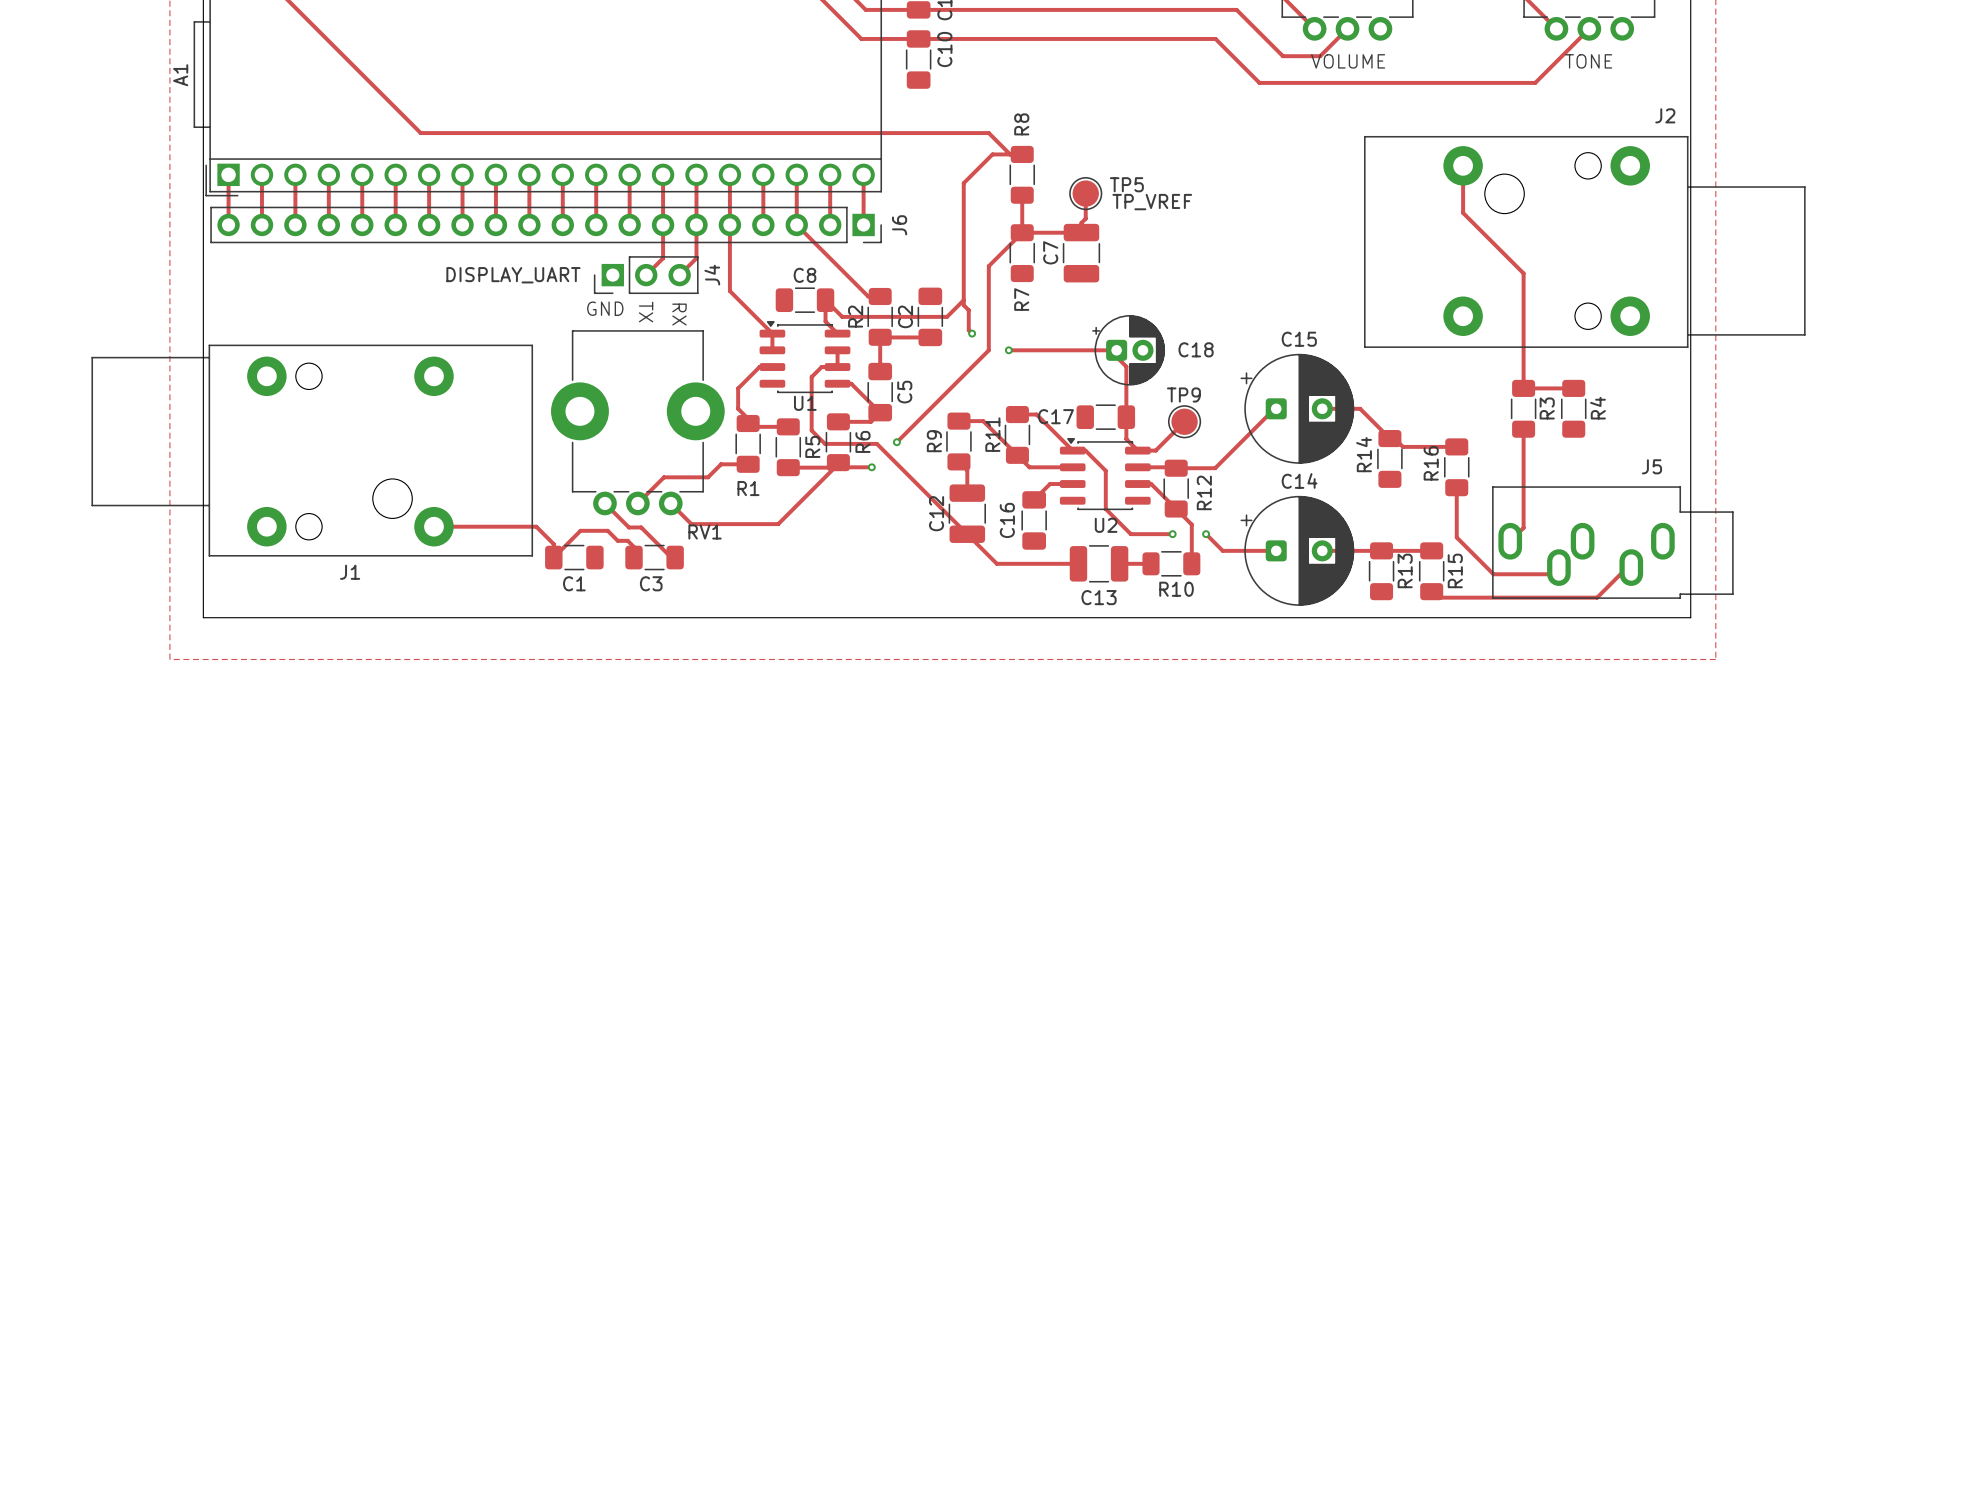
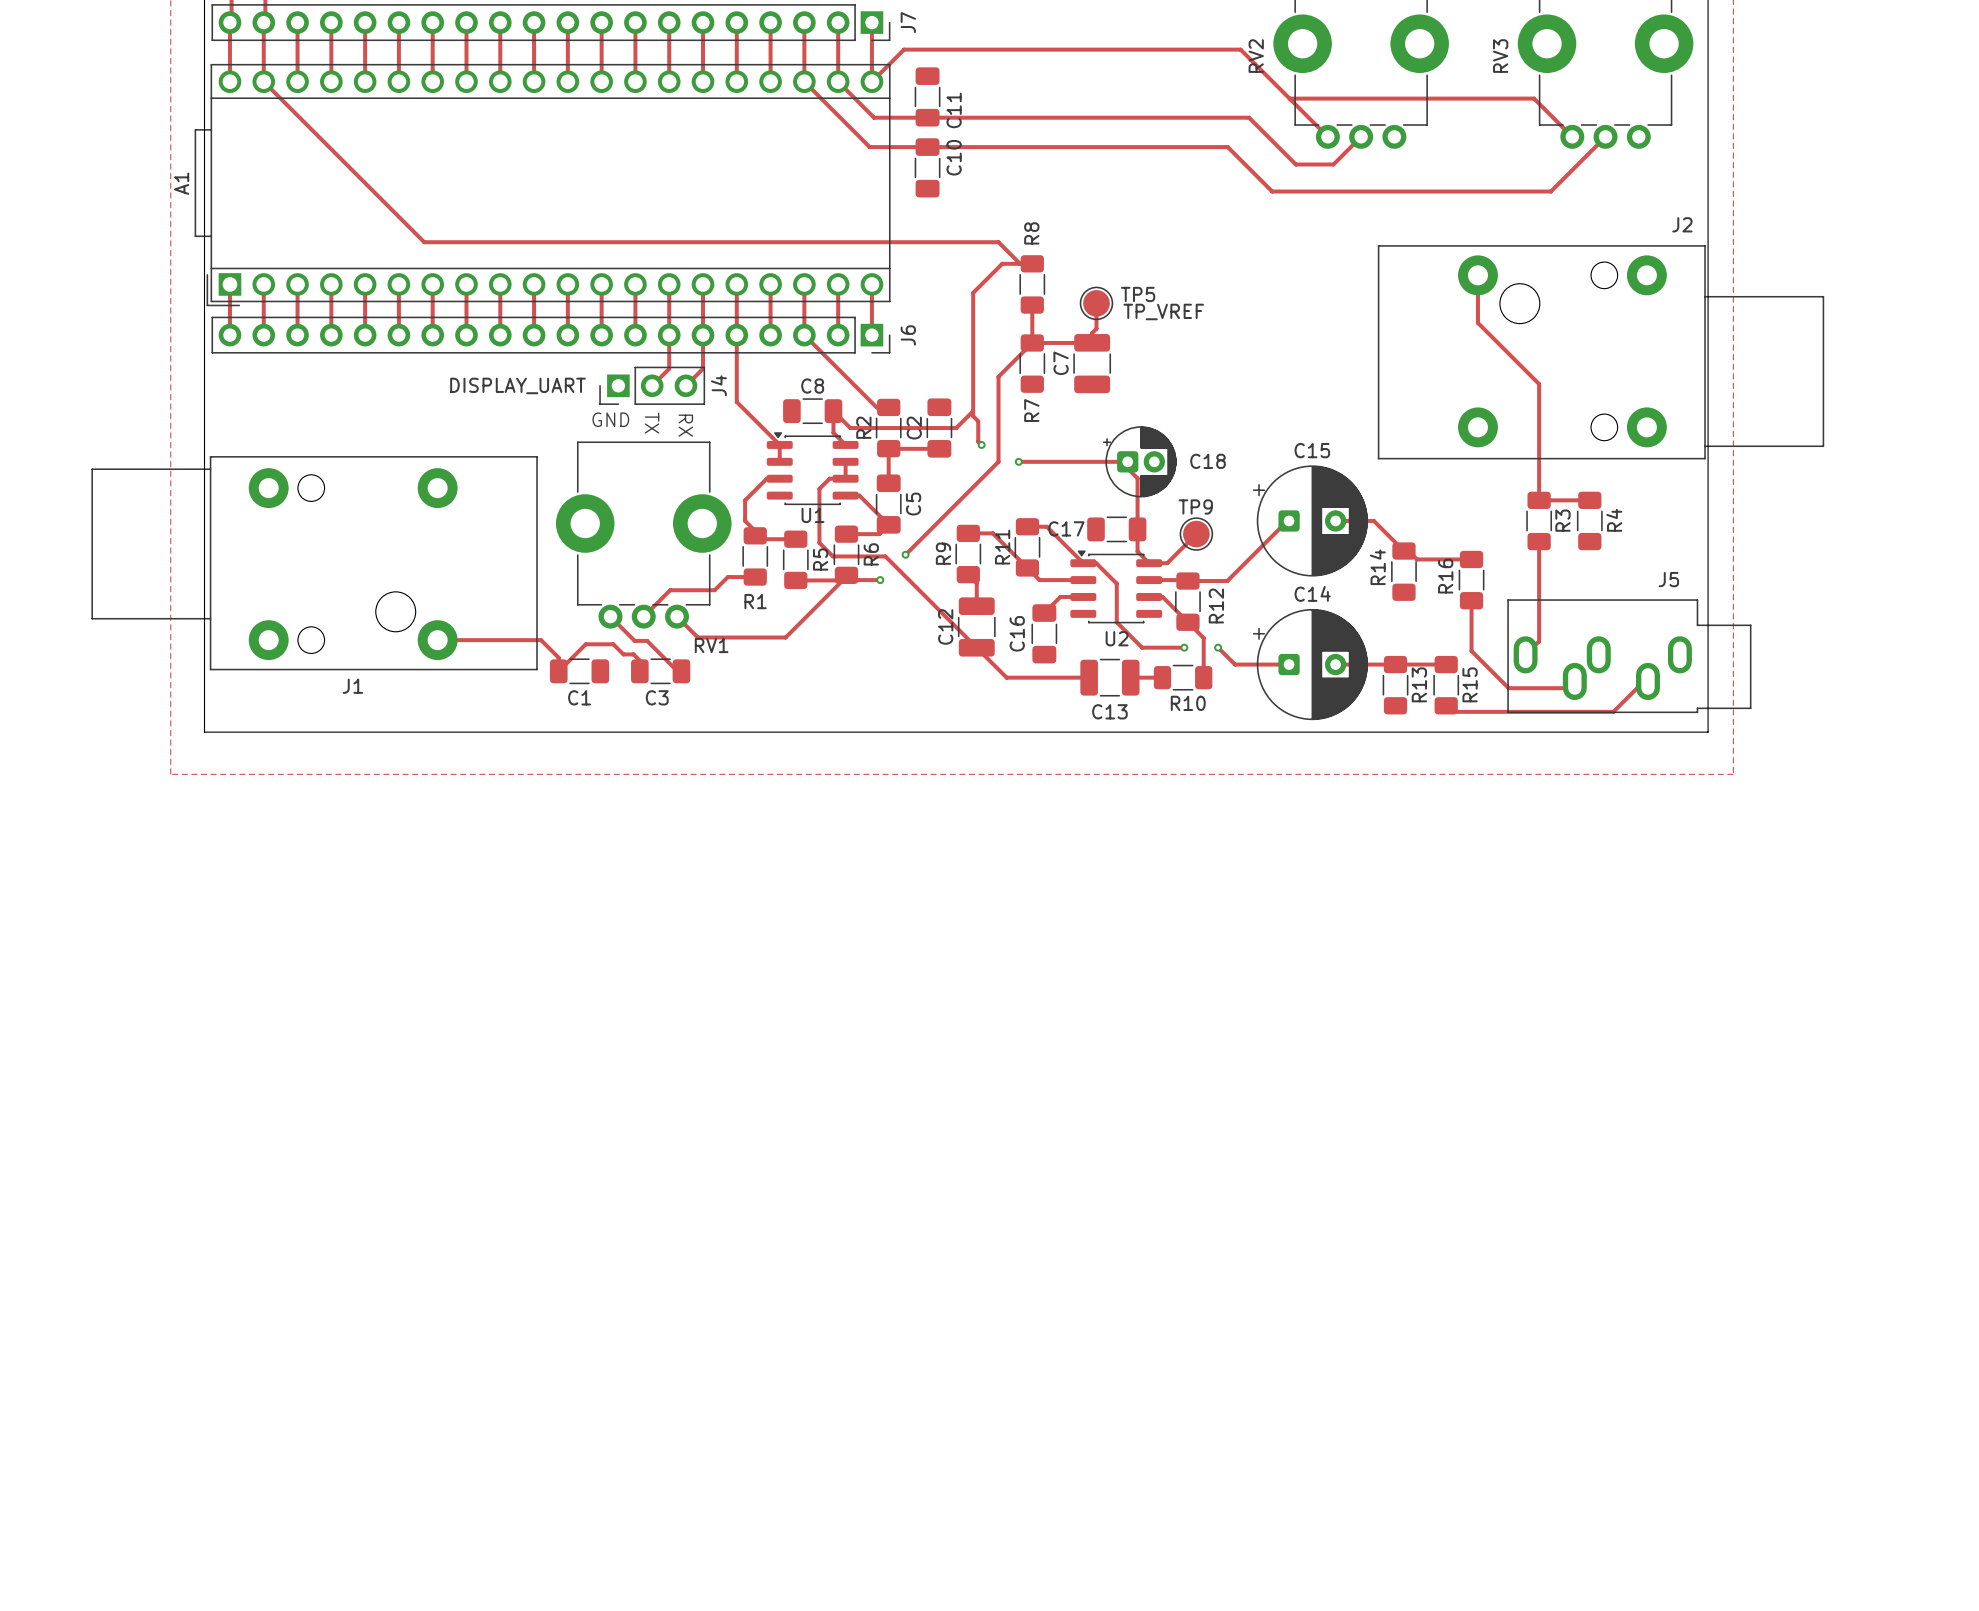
text: VOLUME (1348, 61) -> none
text: TONE (1588, 61) -> none

